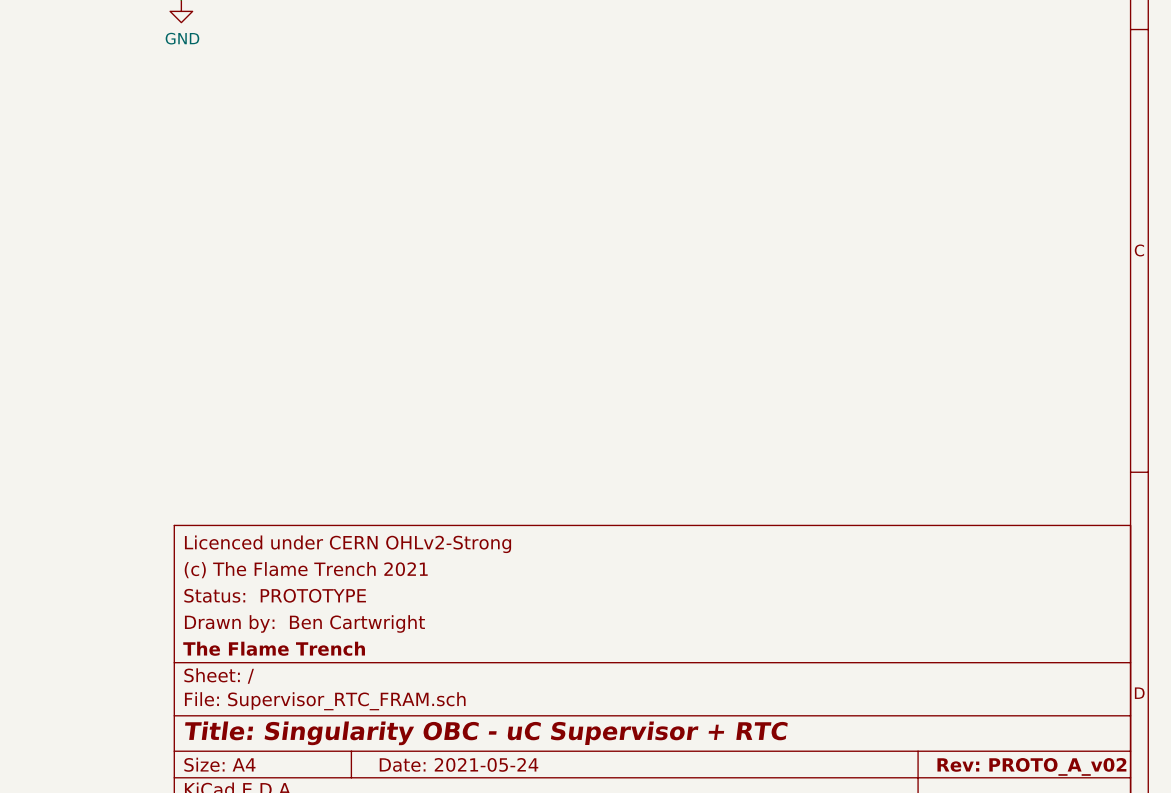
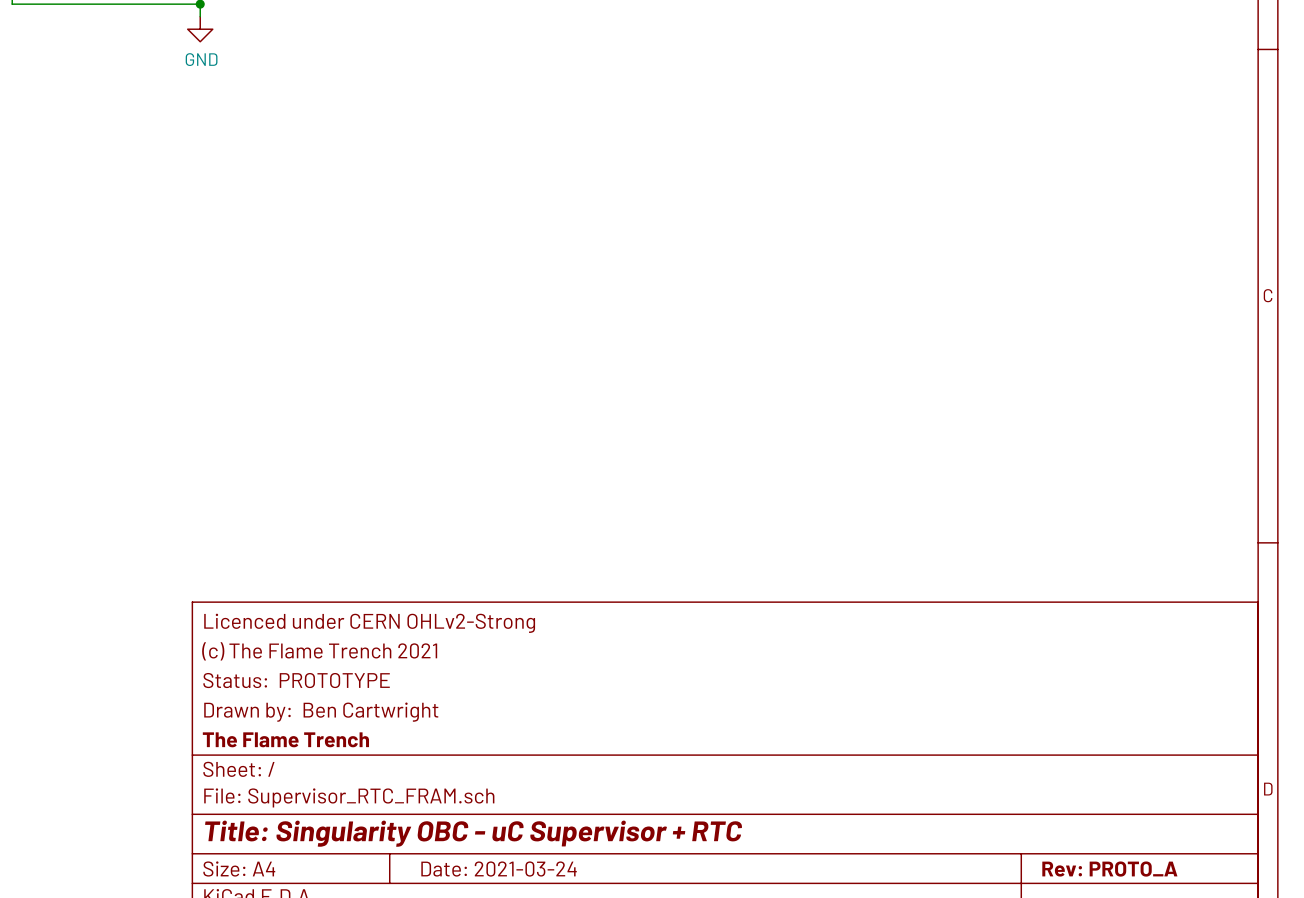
title block: Date: 2021-05-24 (459, 764) -> Date: 2021-03-24 (499, 869)
title block: Rev: PROTO_A_v02 (1031, 766) -> Rev: PROTO_A (1109, 869)

